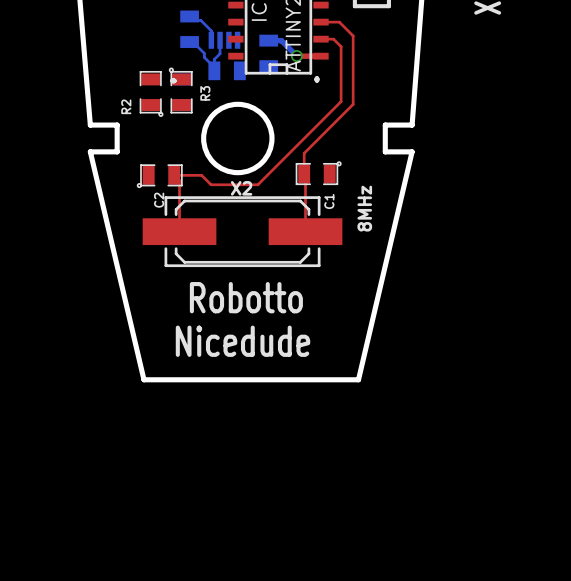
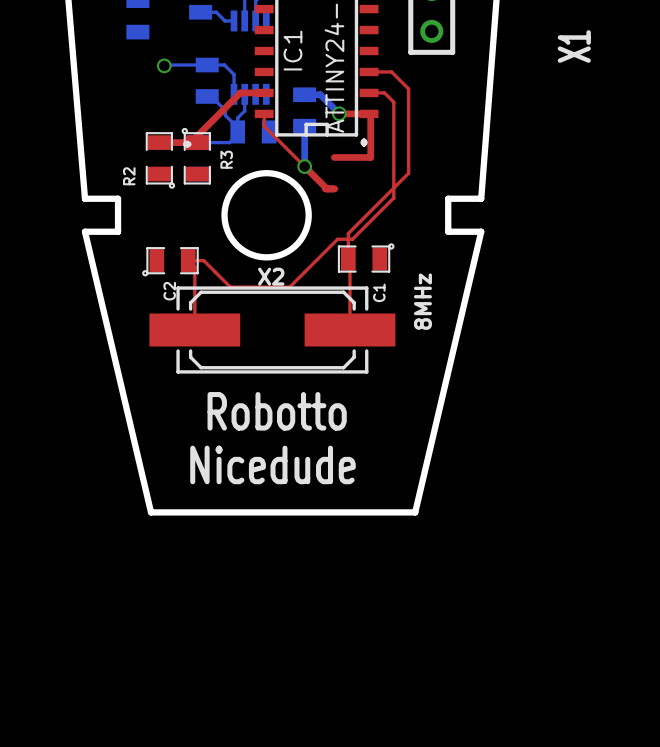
via: none -> (164, 65)
bottom track: (186, 20) (200, 20) (211, 30) -> (164, 65) (224, 65) (234, 74) (234, 82)
top track: none -> (264, 92) (240, 92) (190, 142) (154, 142)
top track: none -> (264, 113) (264, 126) (326, 188)
top track: none -> (369, 113) (370, 115) (370, 157) (334, 157)
bottom track: none -> (304, 126) (304, 166)
bottom track: none -> (237, 131) (237, 134) (229, 142) (198, 142)
via: none -> (304, 166)
top track: (341, 101) (257, 184) (211, 184) (201, 175) (186, 175) -> (393, 169) (393, 197) (352, 239) (337, 239) (289, 287) (230, 287) (203, 260)
top track: none -> (325, 188) (334, 188)

